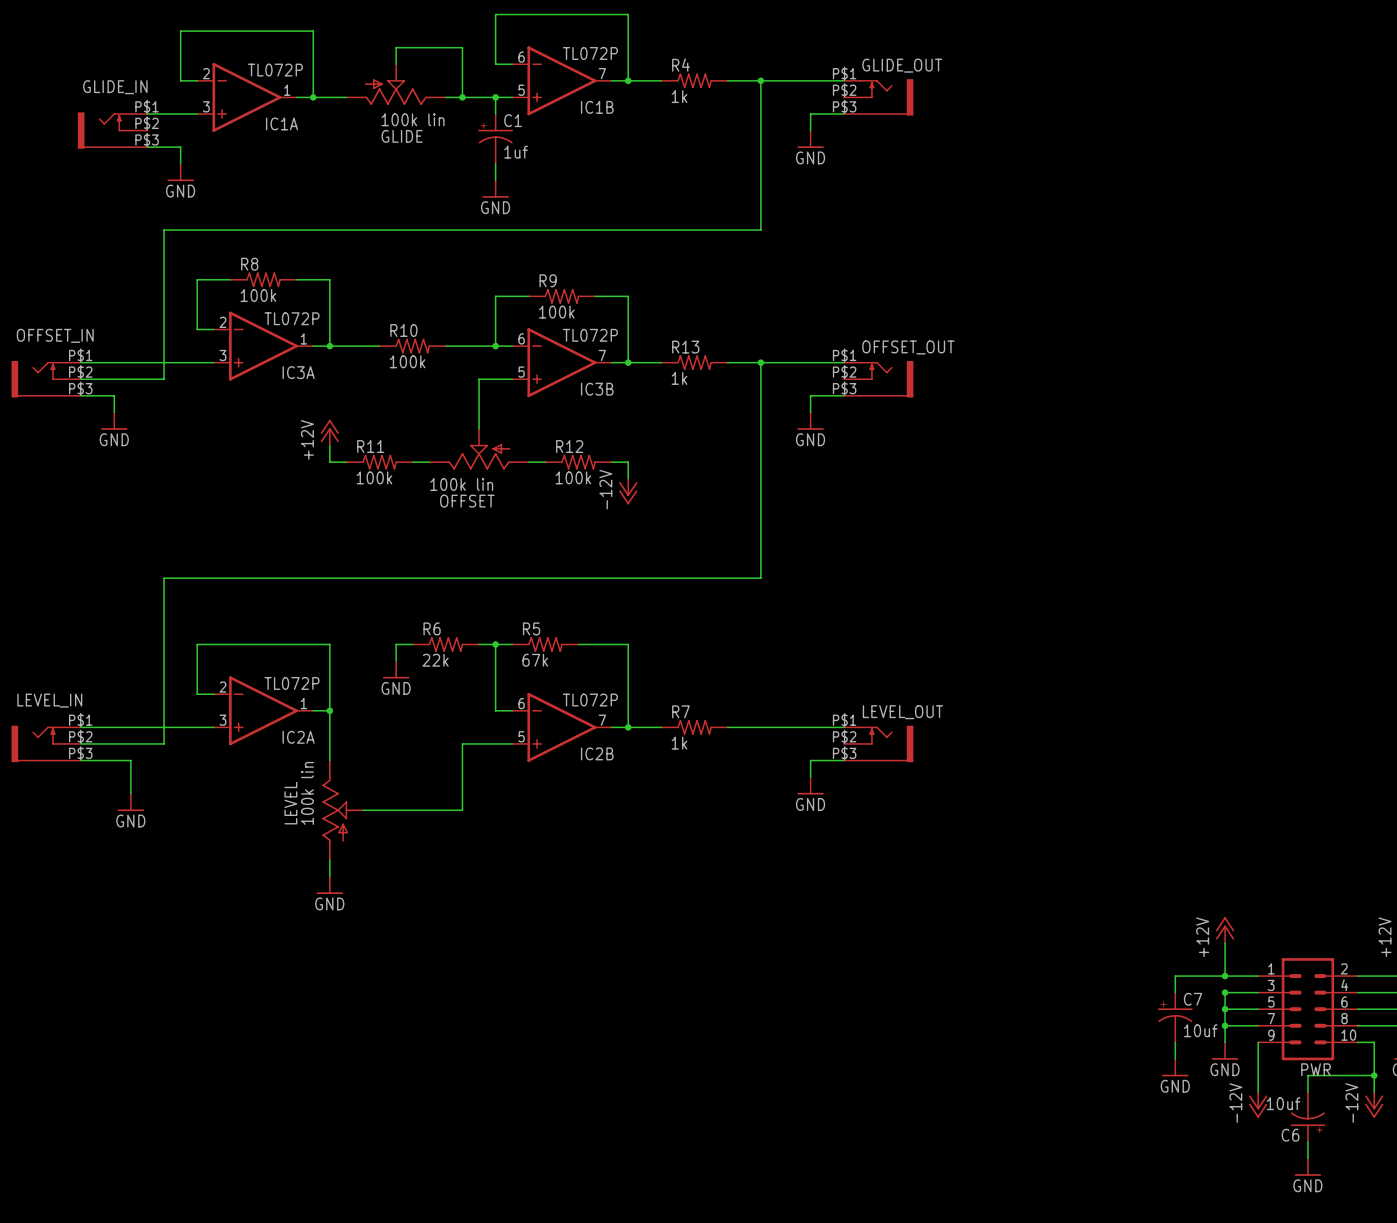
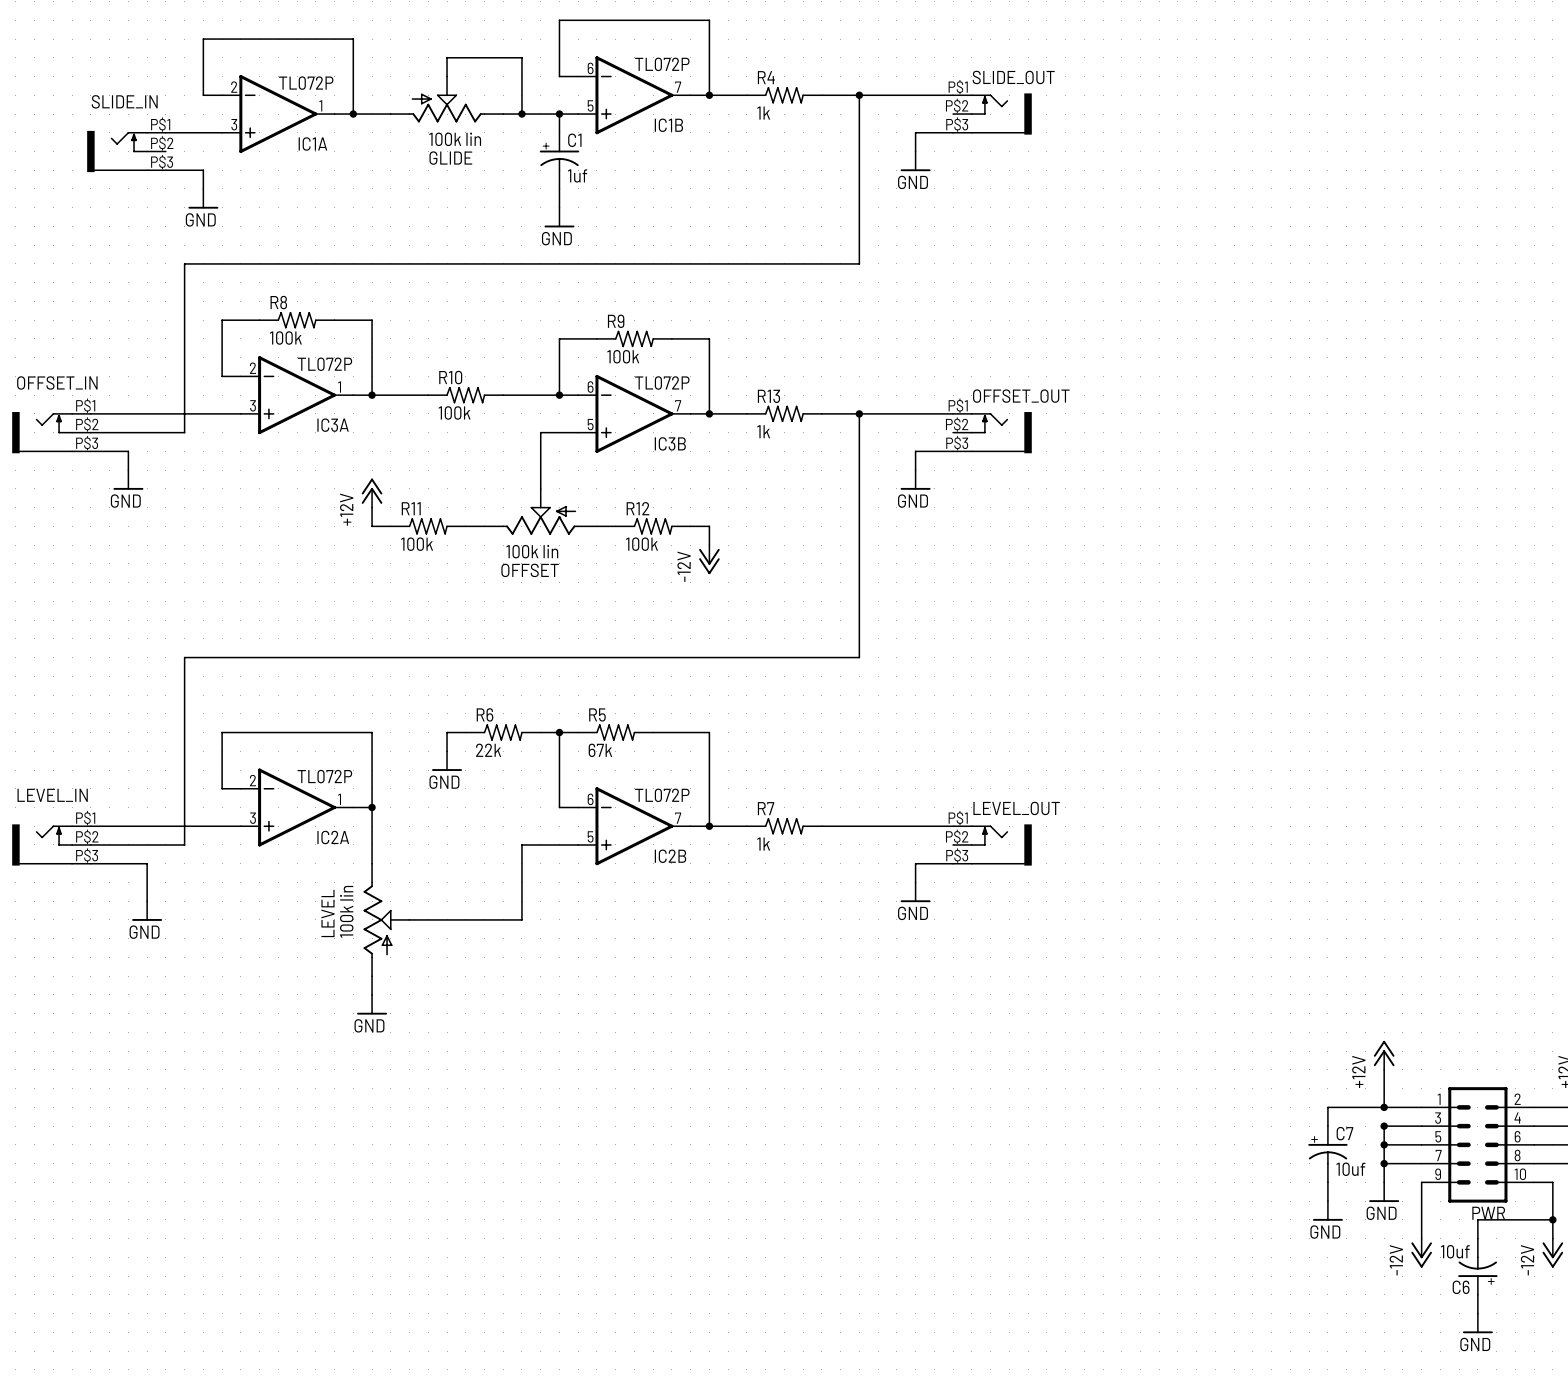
GLIDE_OUT name: GLIDE_OUT (902, 65) -> SLIDE_OUT (1013, 77)
GLIDE_IN name: GLIDE_IN (115, 87) -> SLIDE_IN (124, 101)

